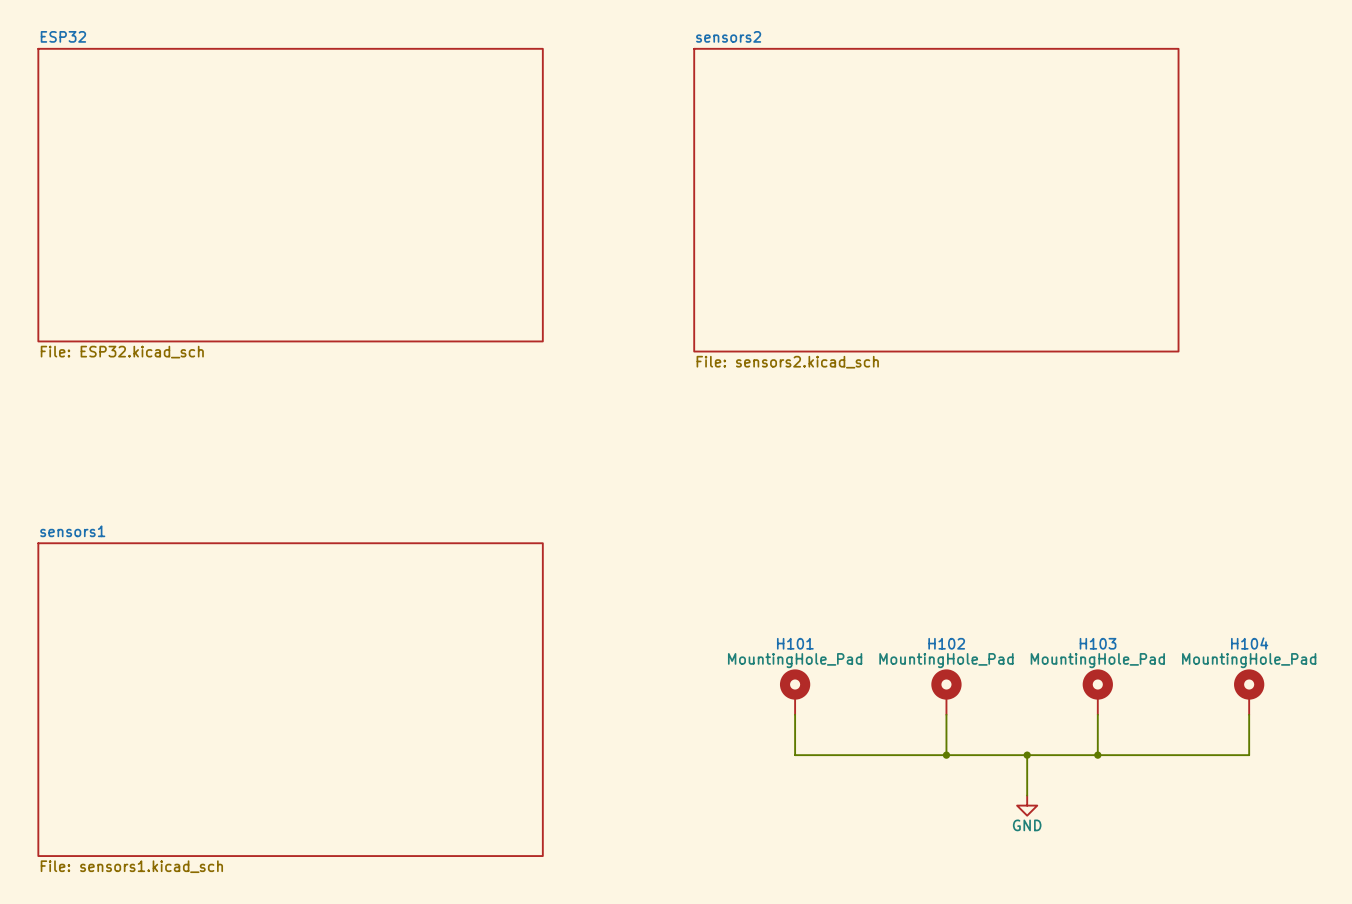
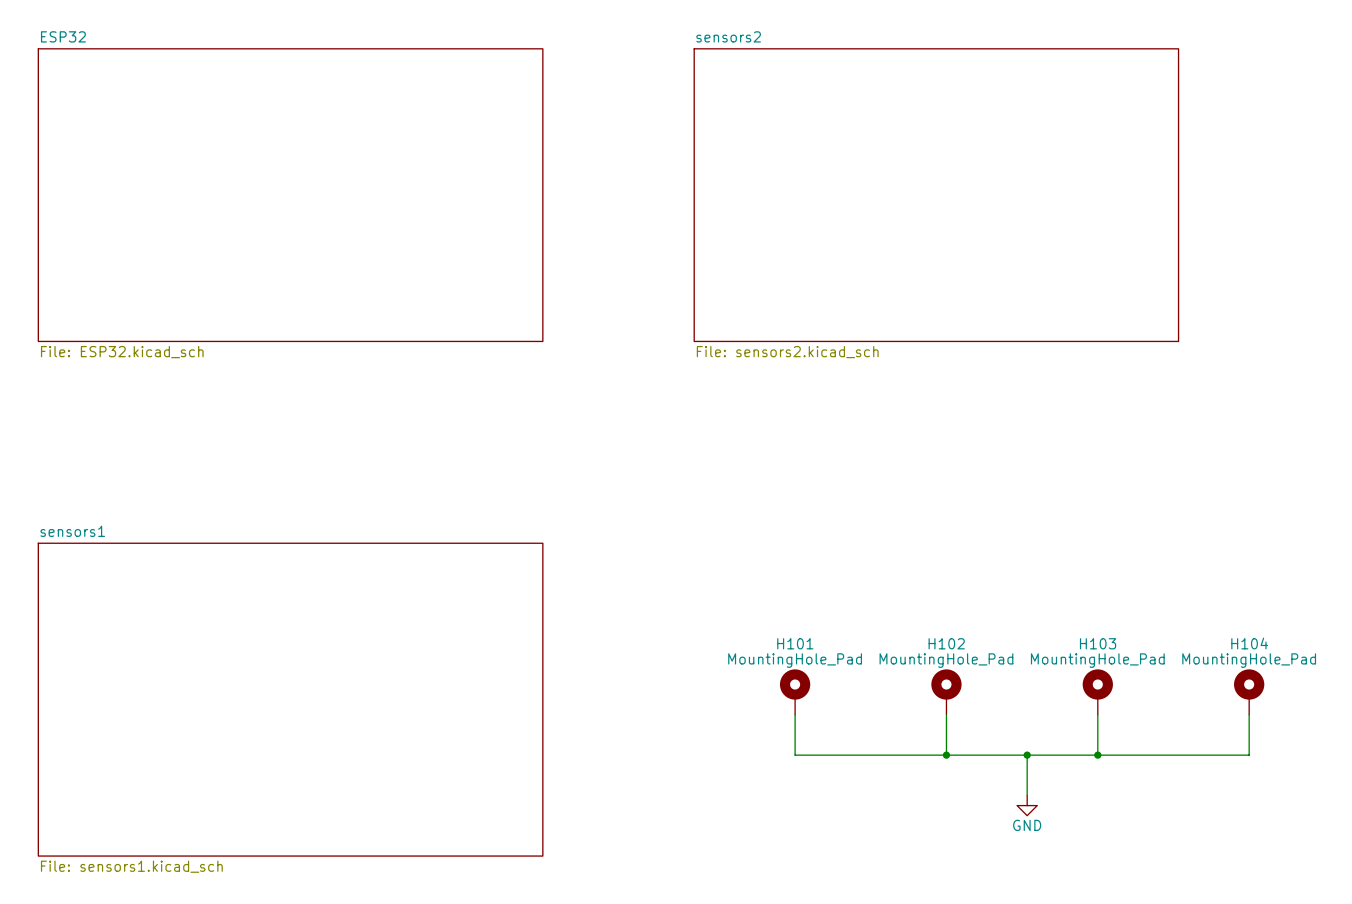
sheet sensors2 shape: [693, 48, 1180, 353] -> [693, 48, 1180, 343]

